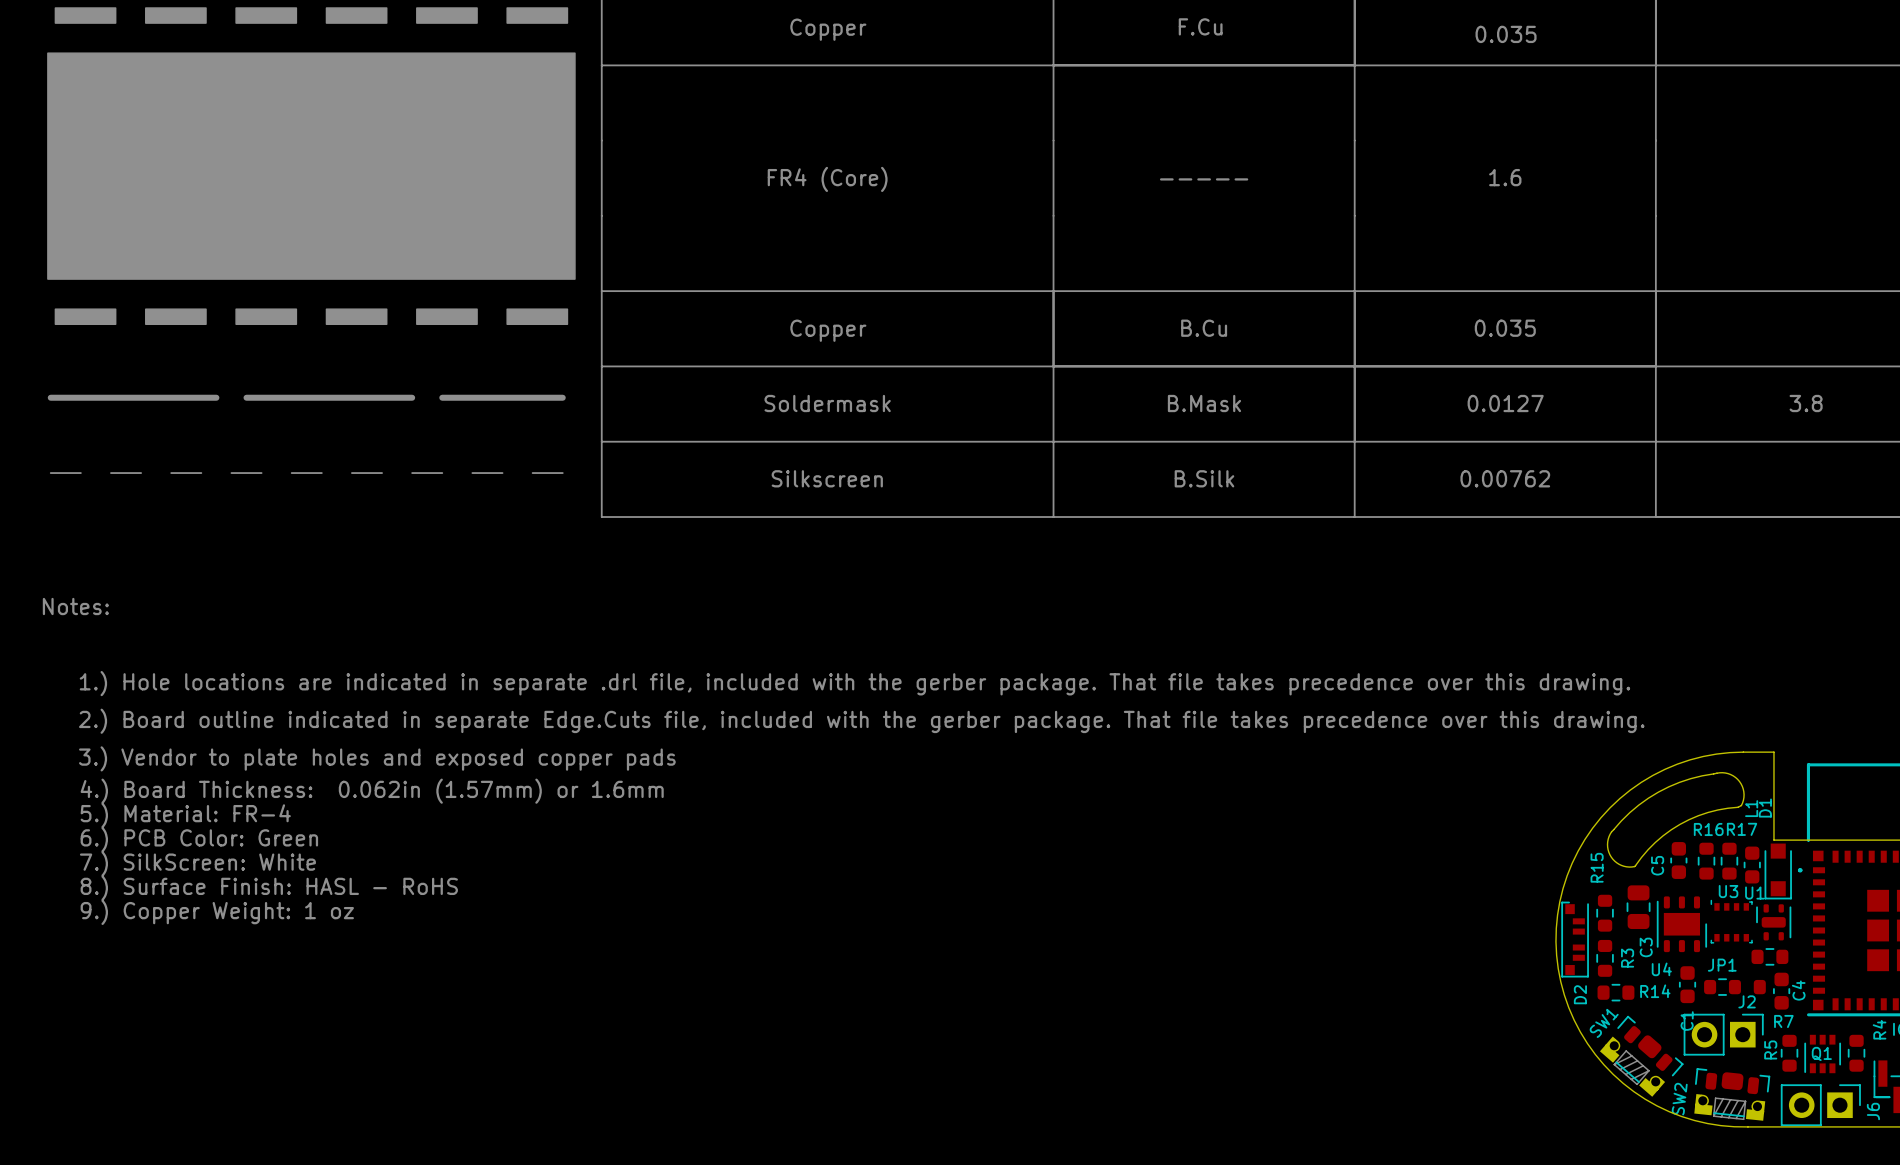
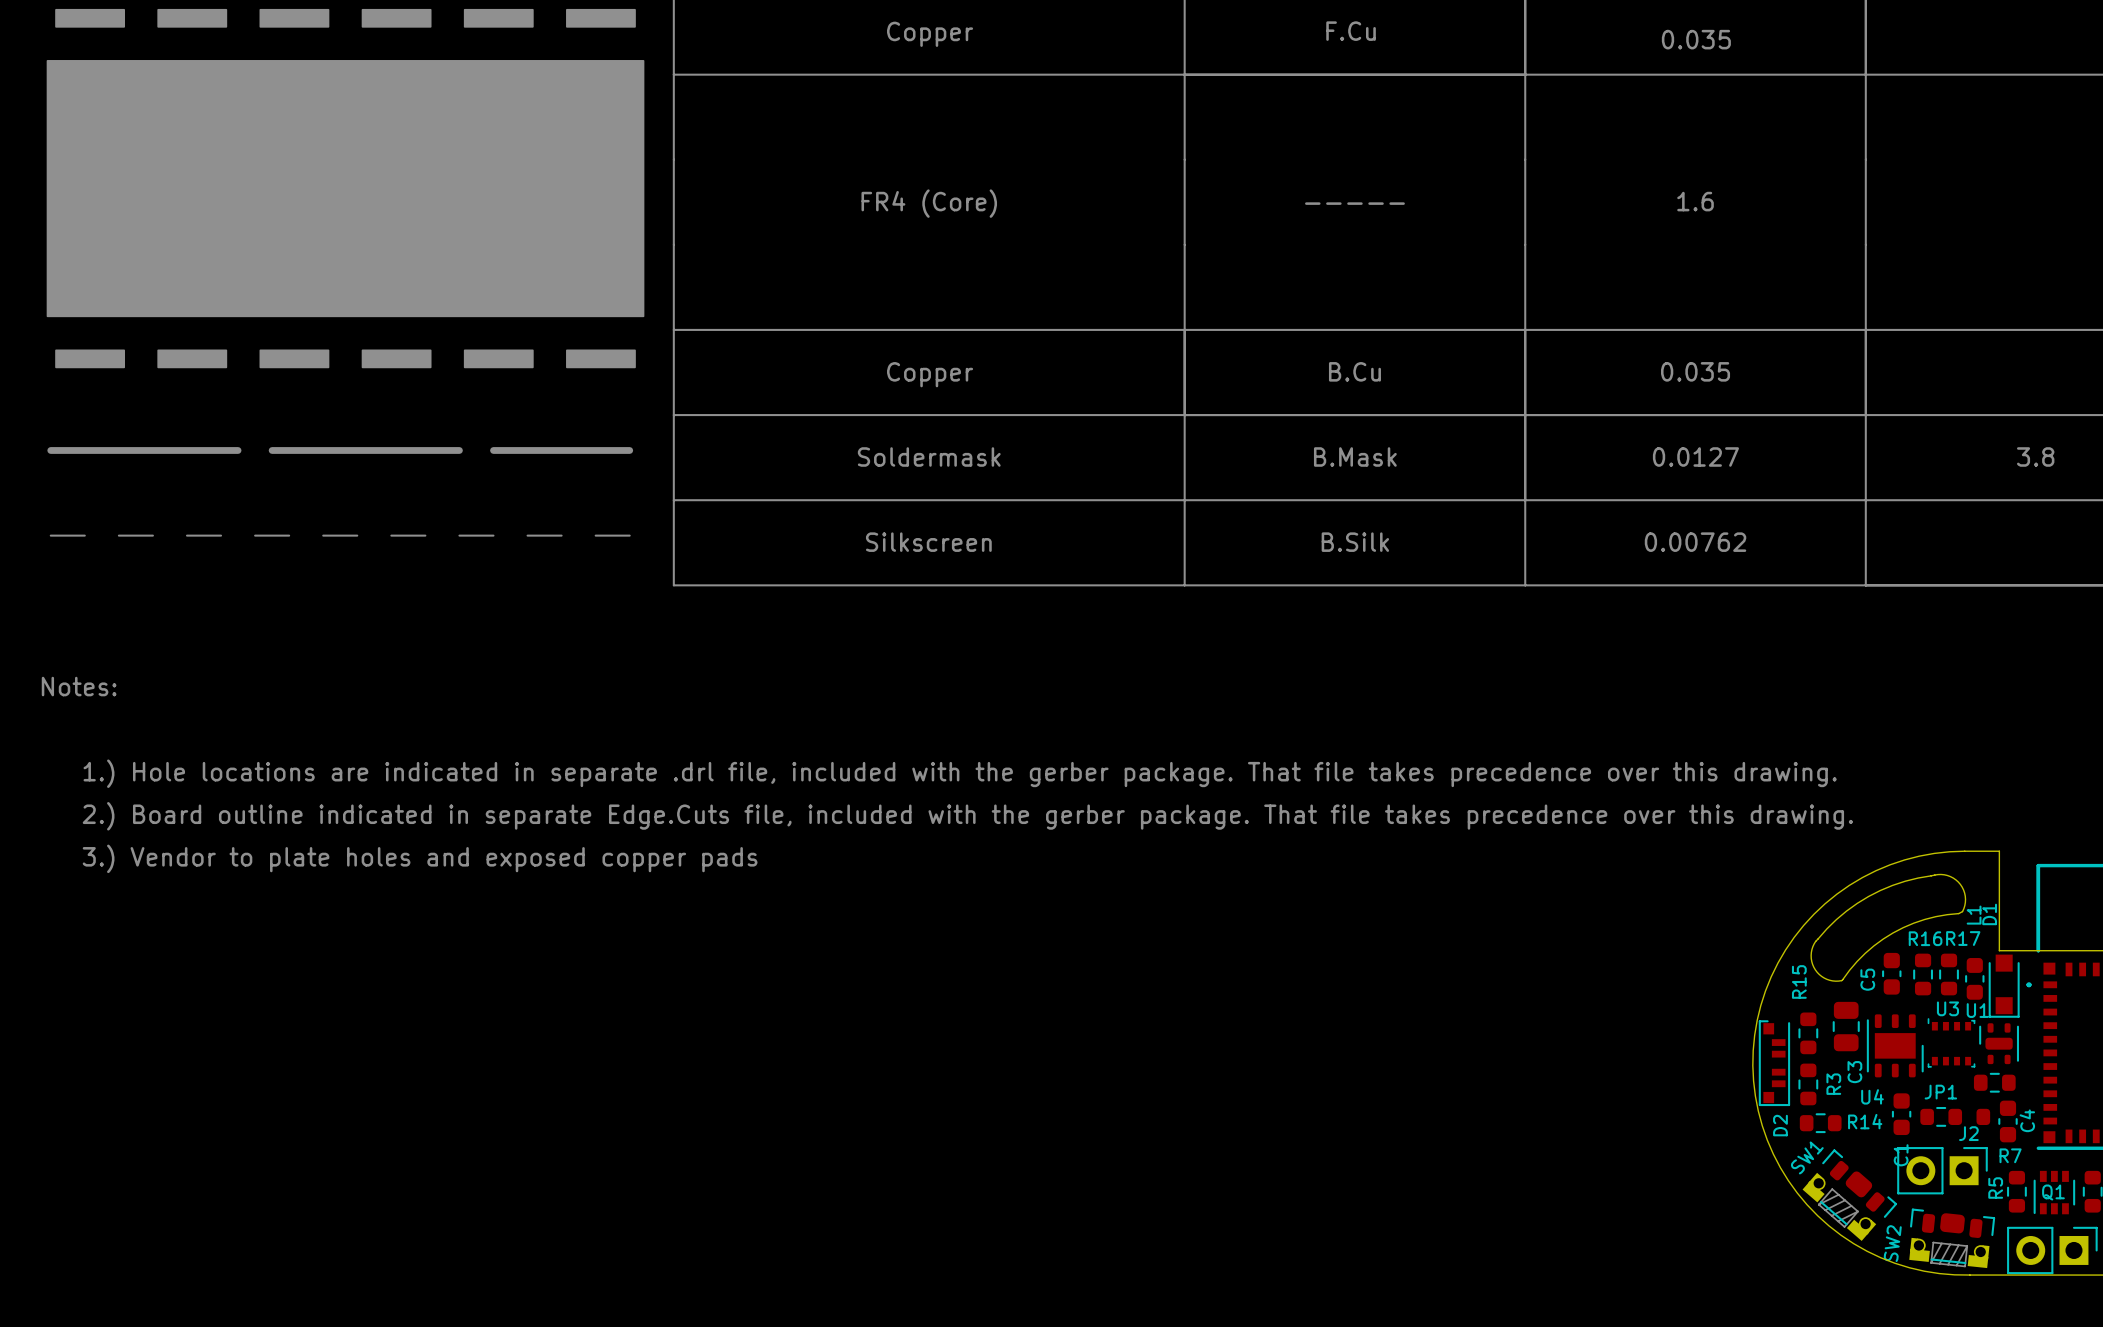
text: 4.) Board Thickness: 0.062in (1.57mm) or 1.6mm (372, 791) -> none
text: 5.) Material: FR-4 (185, 815) -> none
text: 6.) PCB Color: Green (199, 839) -> none
text: 7.) SilkScreen: White (197, 863) -> none
text: 8.) Surface Finish: HASL - RoHS (269, 888) -> none
text: 9.) Copper Weight: 1 oz (217, 912) -> none

